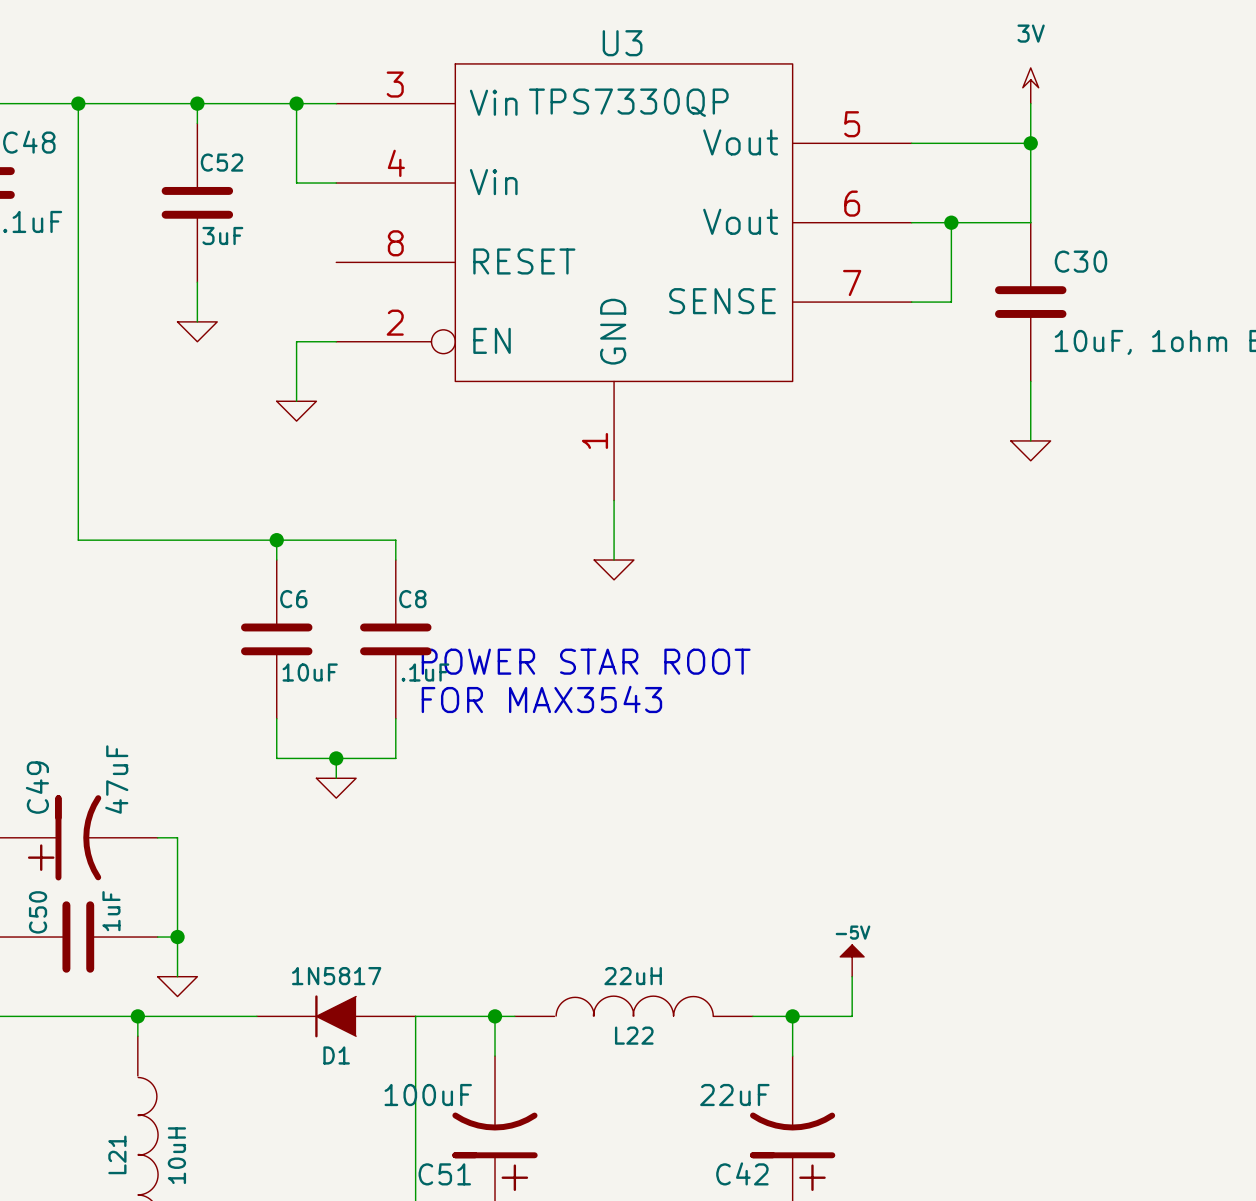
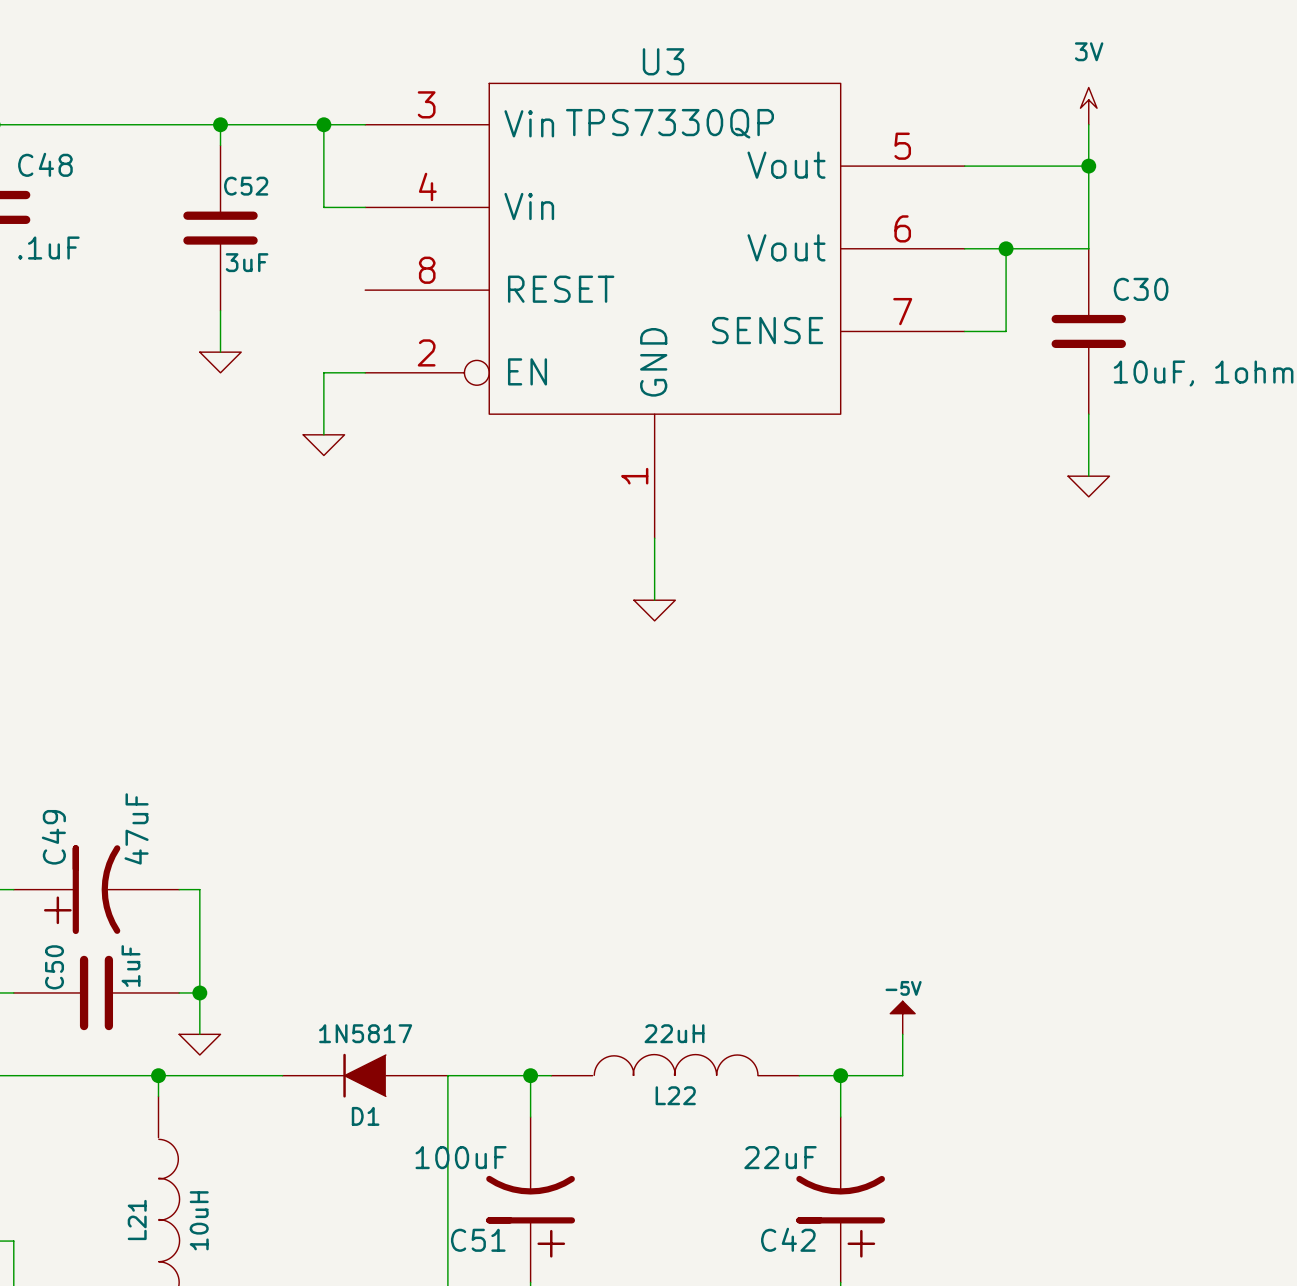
wire: (78, 103) (78, 540) (395, 540) (395, 560) -> none
junction: (78, 103) -> none
wire: (276, 540) (276, 560) -> none
junction: (276, 540) -> none
C6: 10uF (276, 639) -> none
C8: .1uF (395, 639) -> none
text: POWER STAR ROOT (586, 661) -> none
text: FOR MAX3543 (541, 699) -> none
wire: (276, 718) (276, 758) (395, 758) (395, 718) -> none
wire: (336, 758) (336, 778) -> none
junction: (336, 758) -> none
power symbol: (336, 788) -> none

